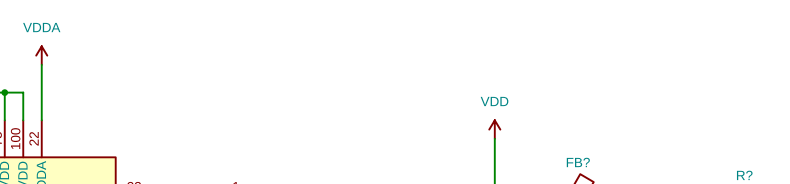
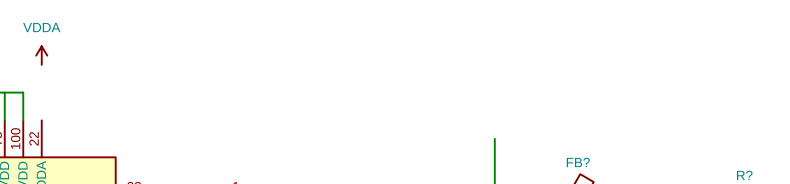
wire: (41, 64) (41, 120) -> none
junction: (4, 92) -> none
power symbol: VDD (494, 129) -> none

